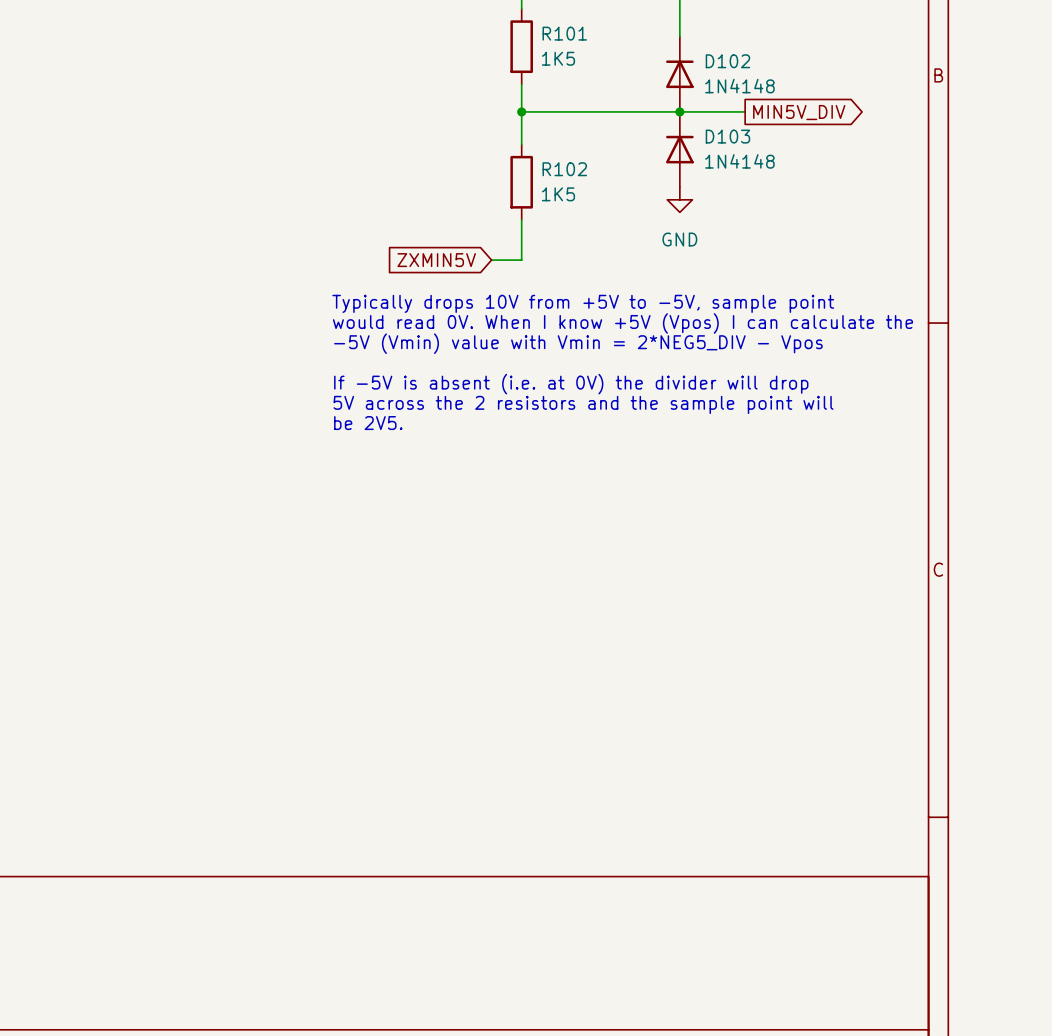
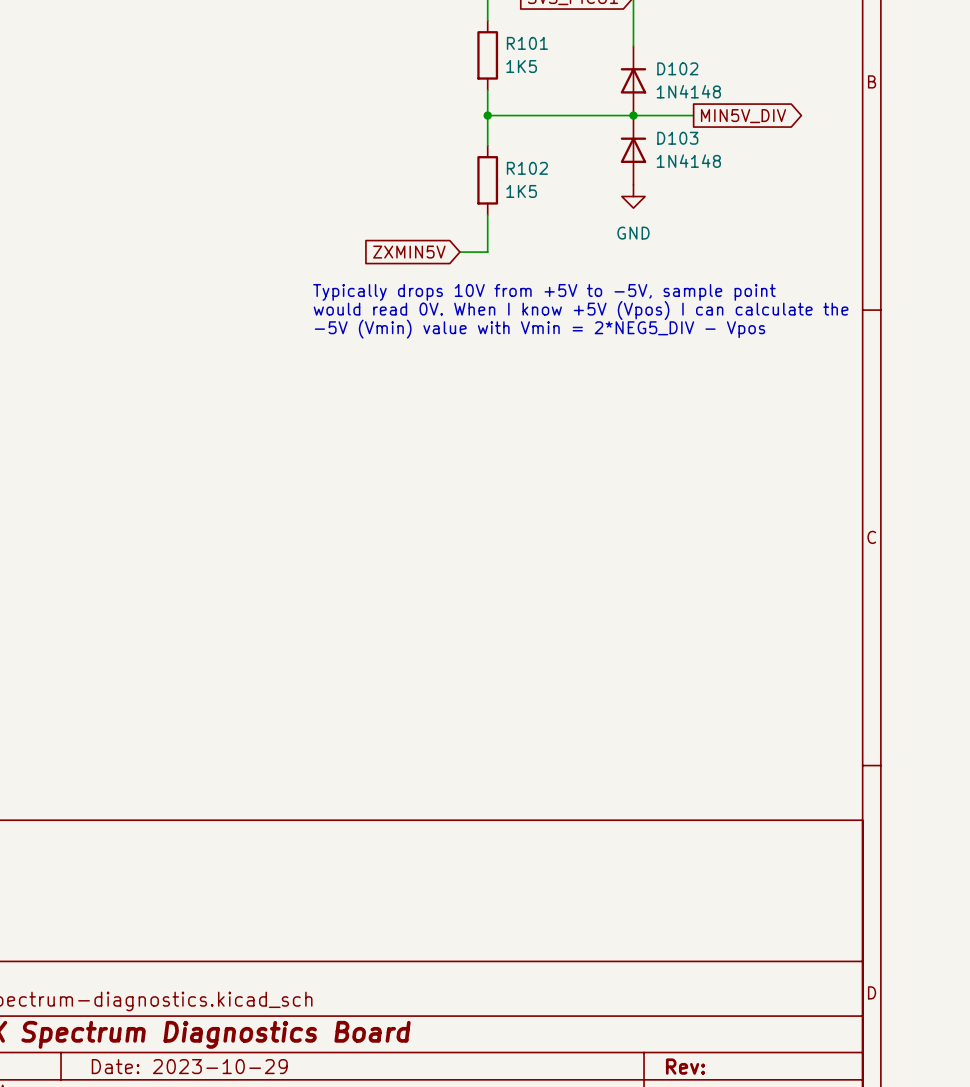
text: If -5V is absent (i.e. at 0V) the divider will drop (571, 384) -> none
text: 5V across the 2 resistors and the sample point will (583, 404) -> none
text: be 2V5. (368, 423) -> none

